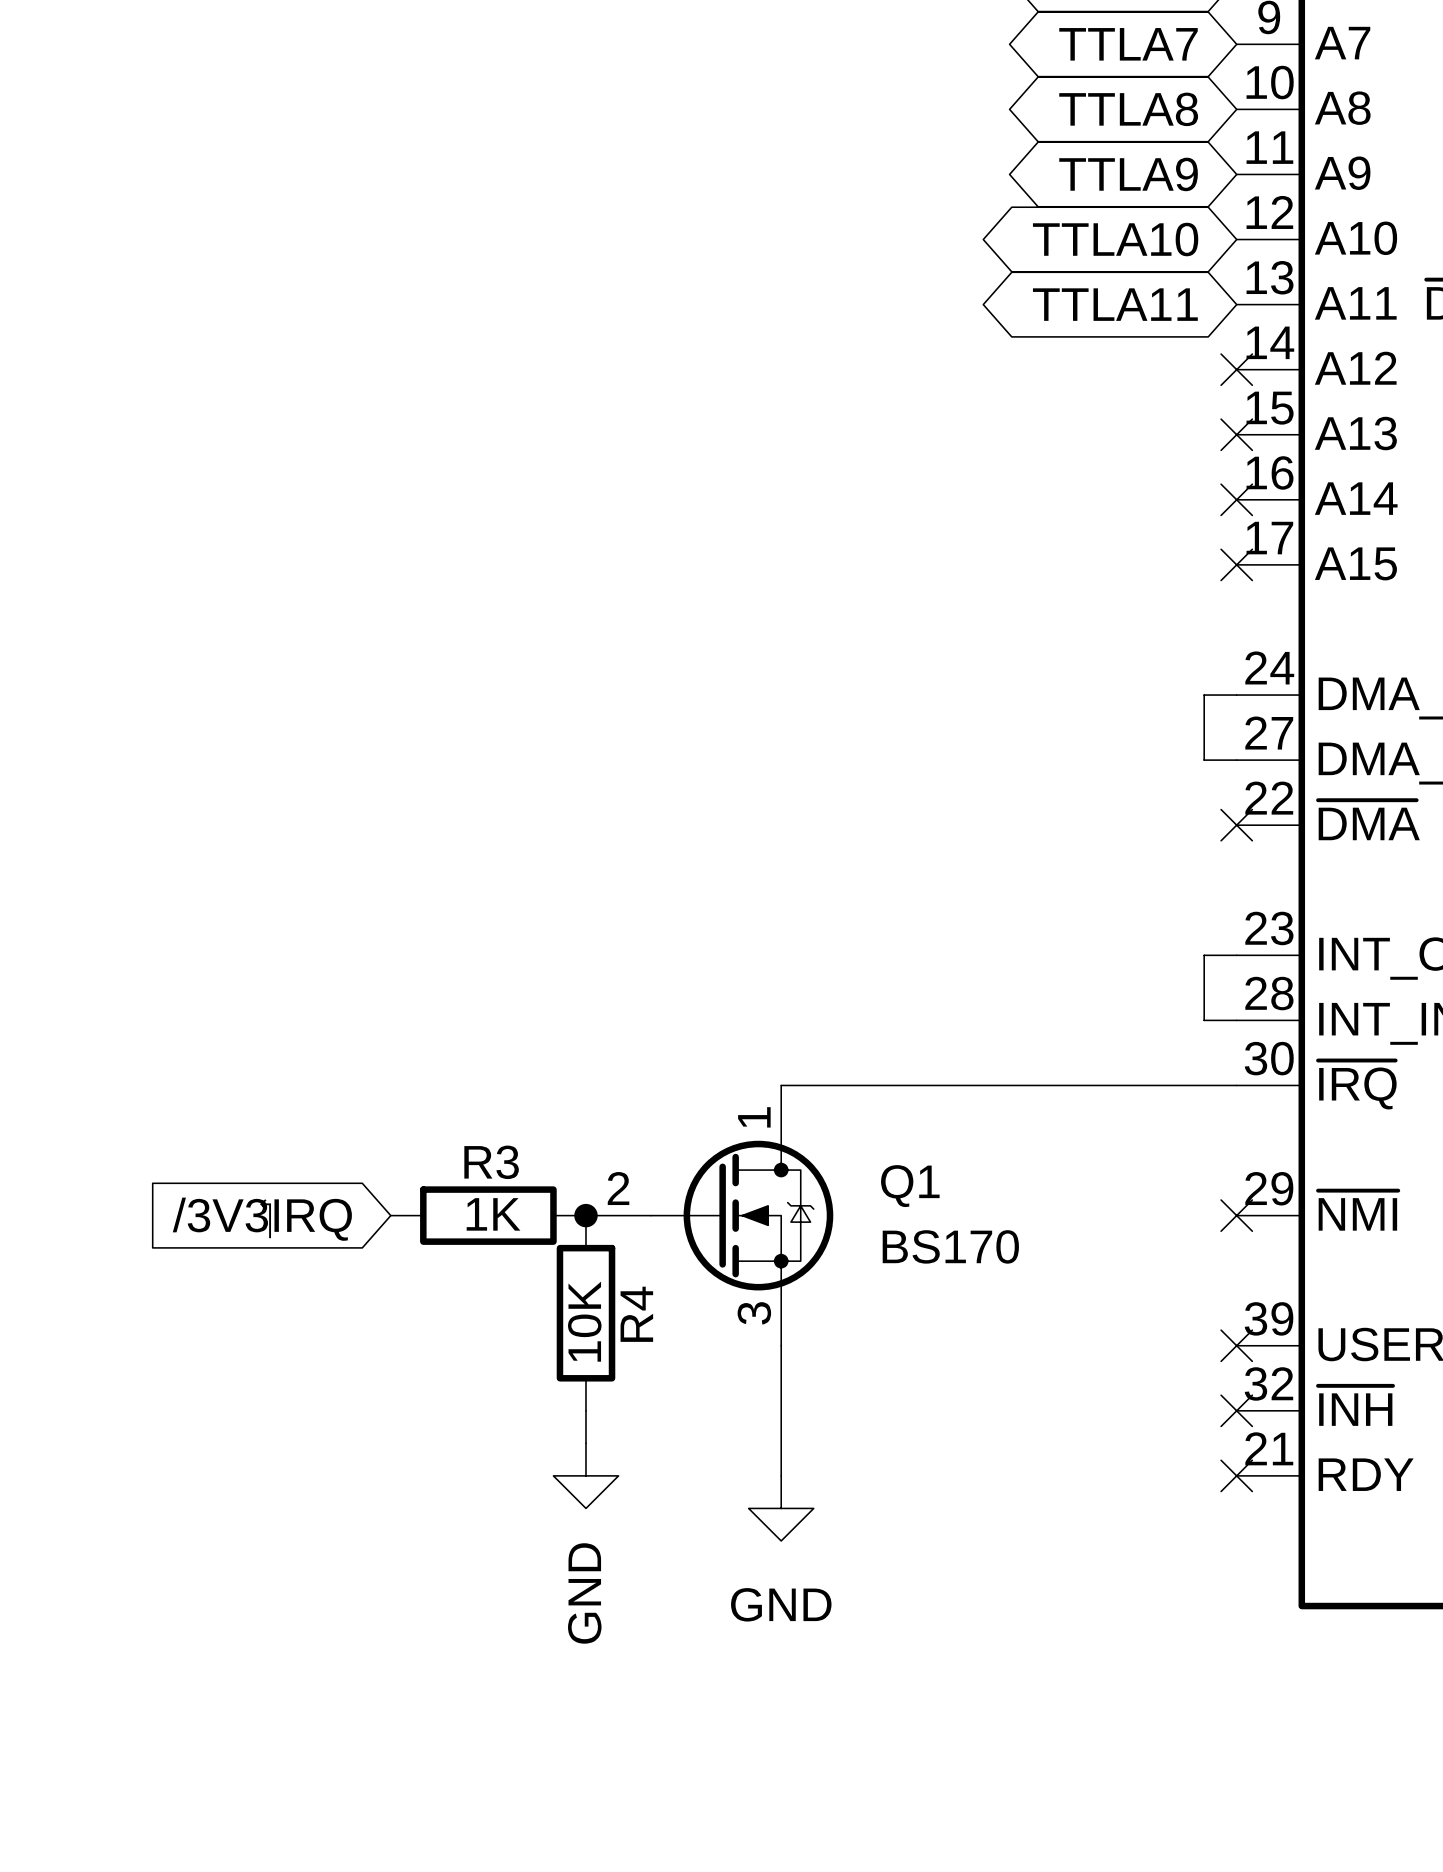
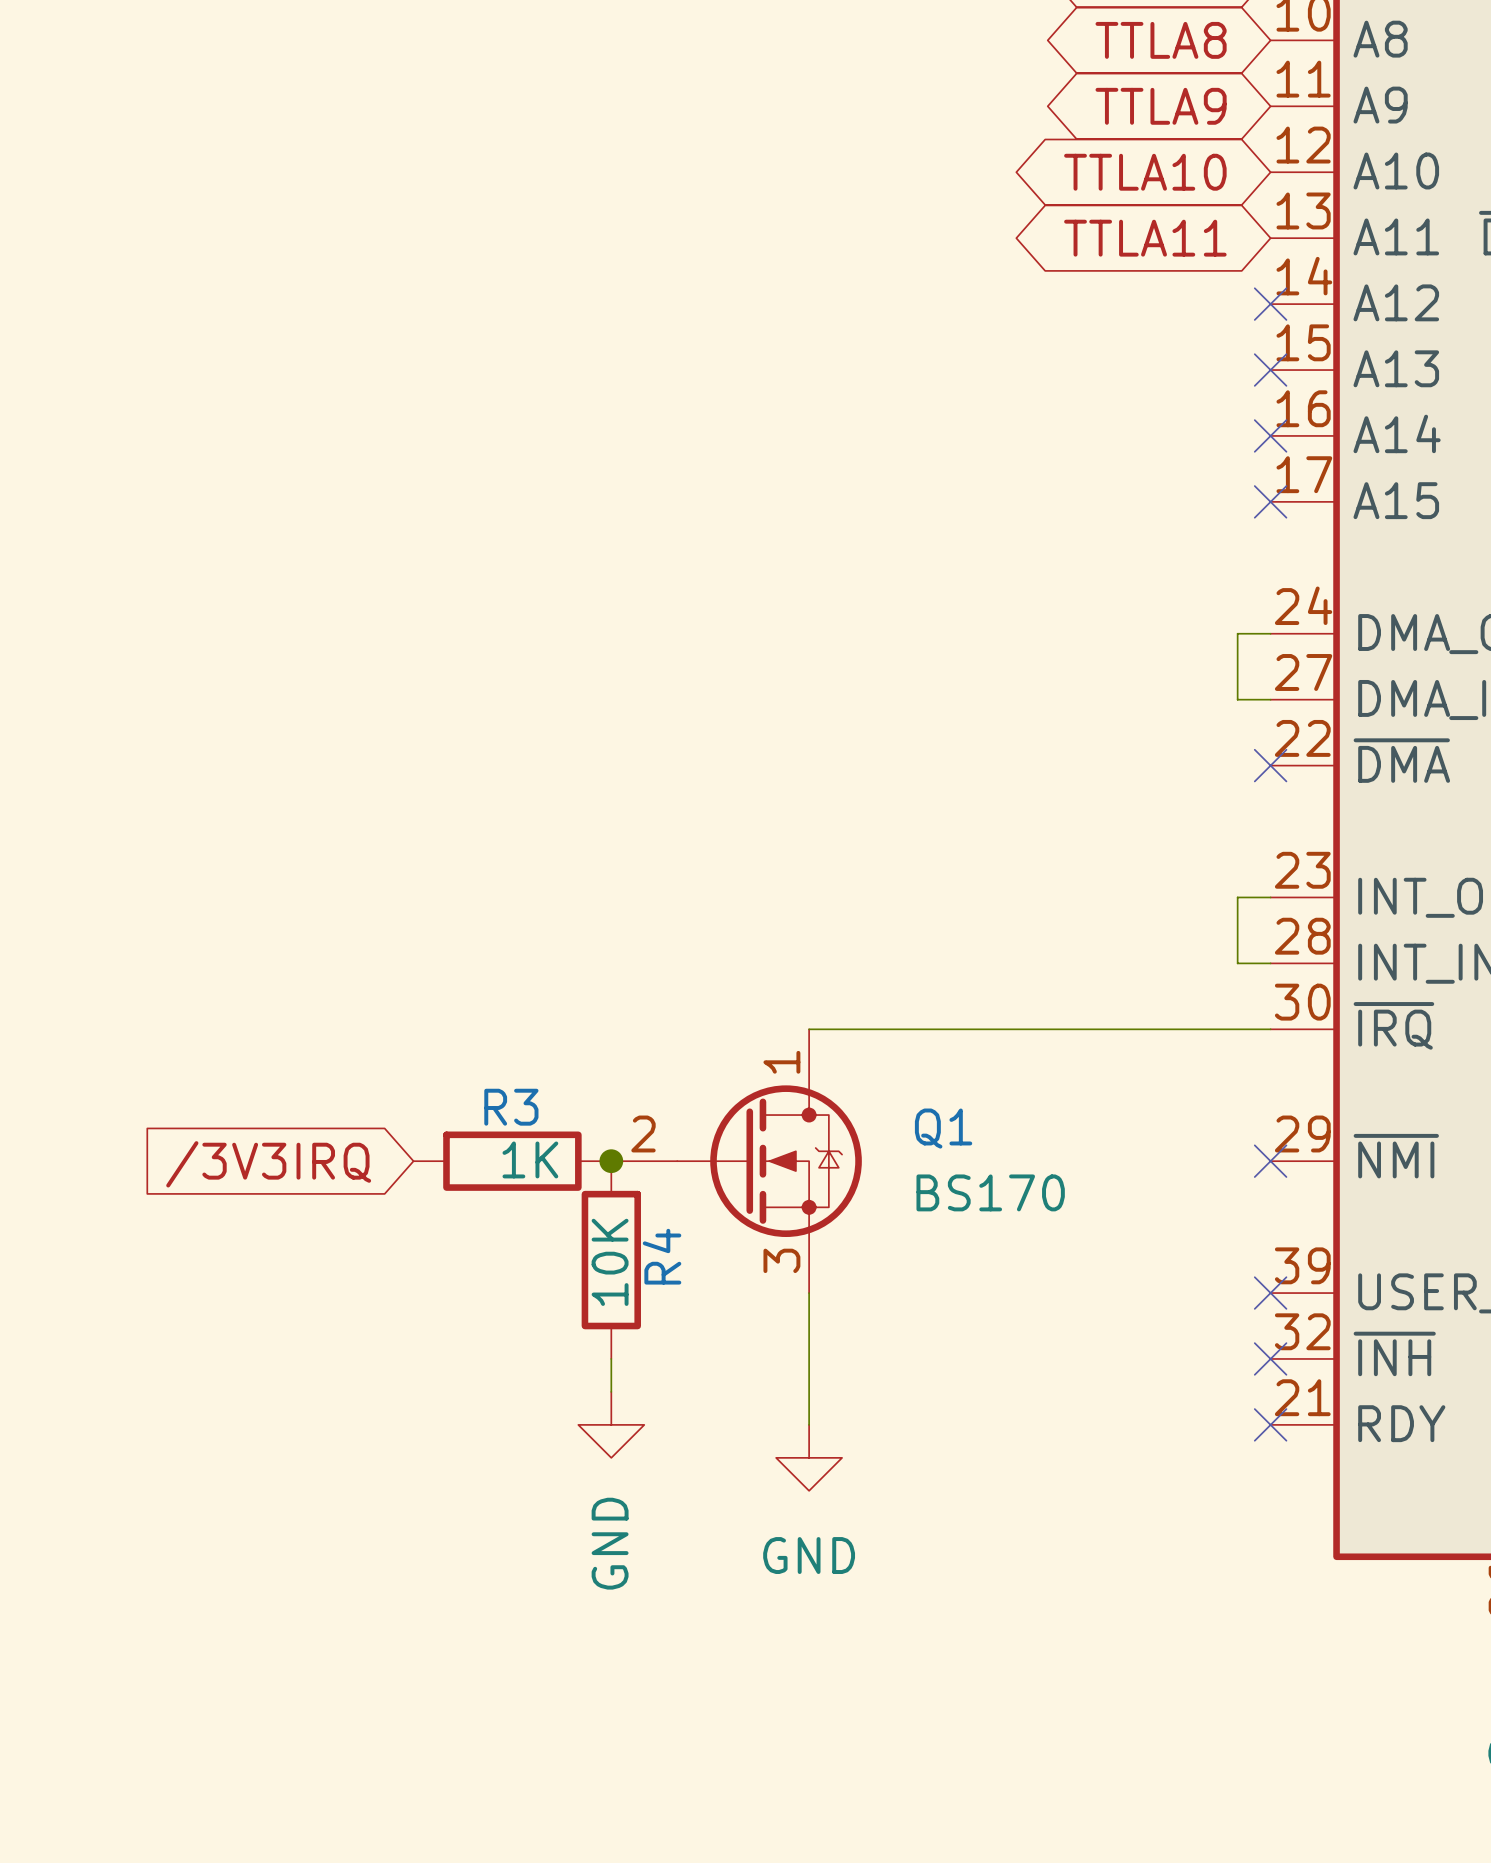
R3 value position: 1K (493, 1214) -> 1K (530, 1159)

